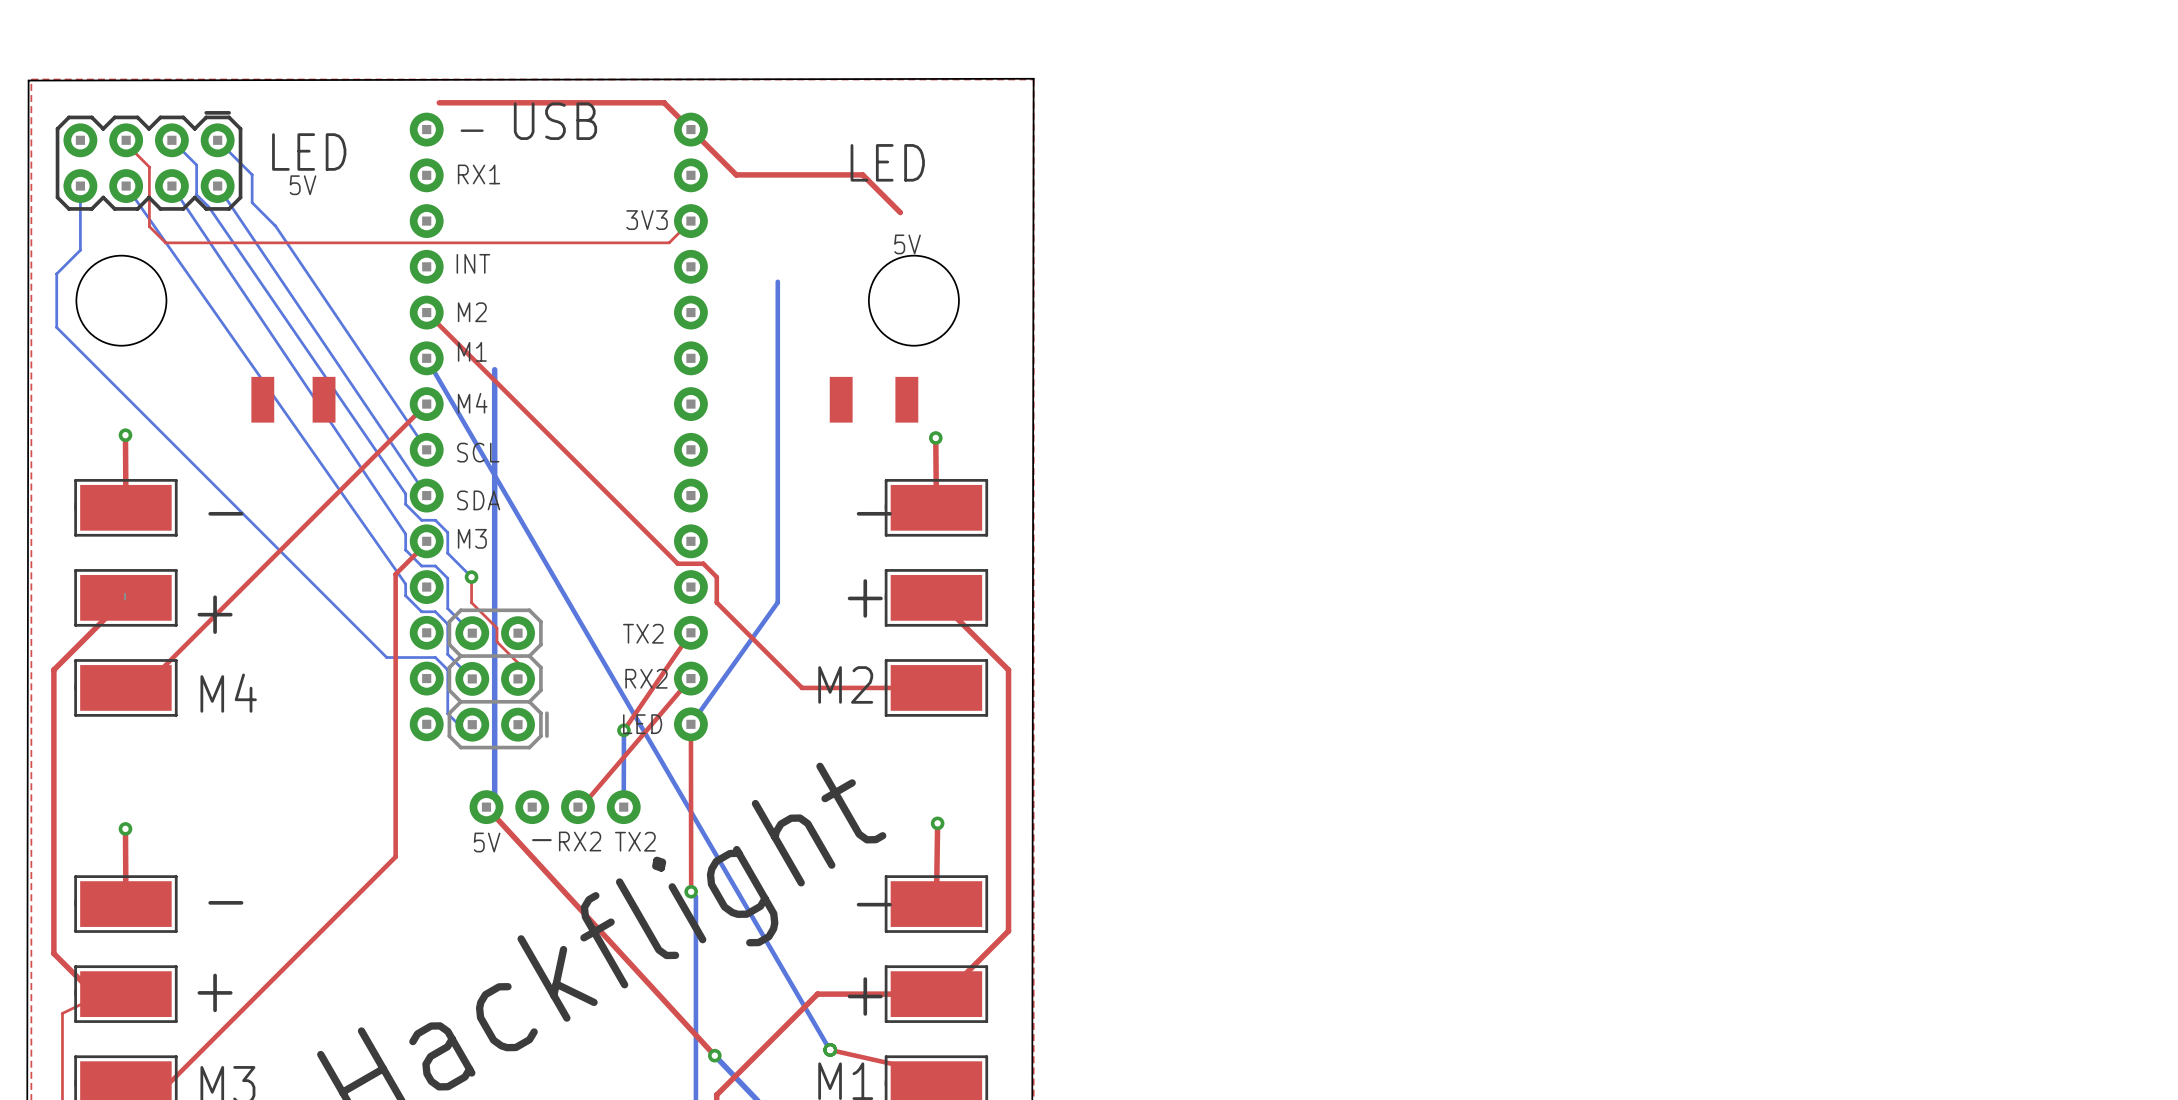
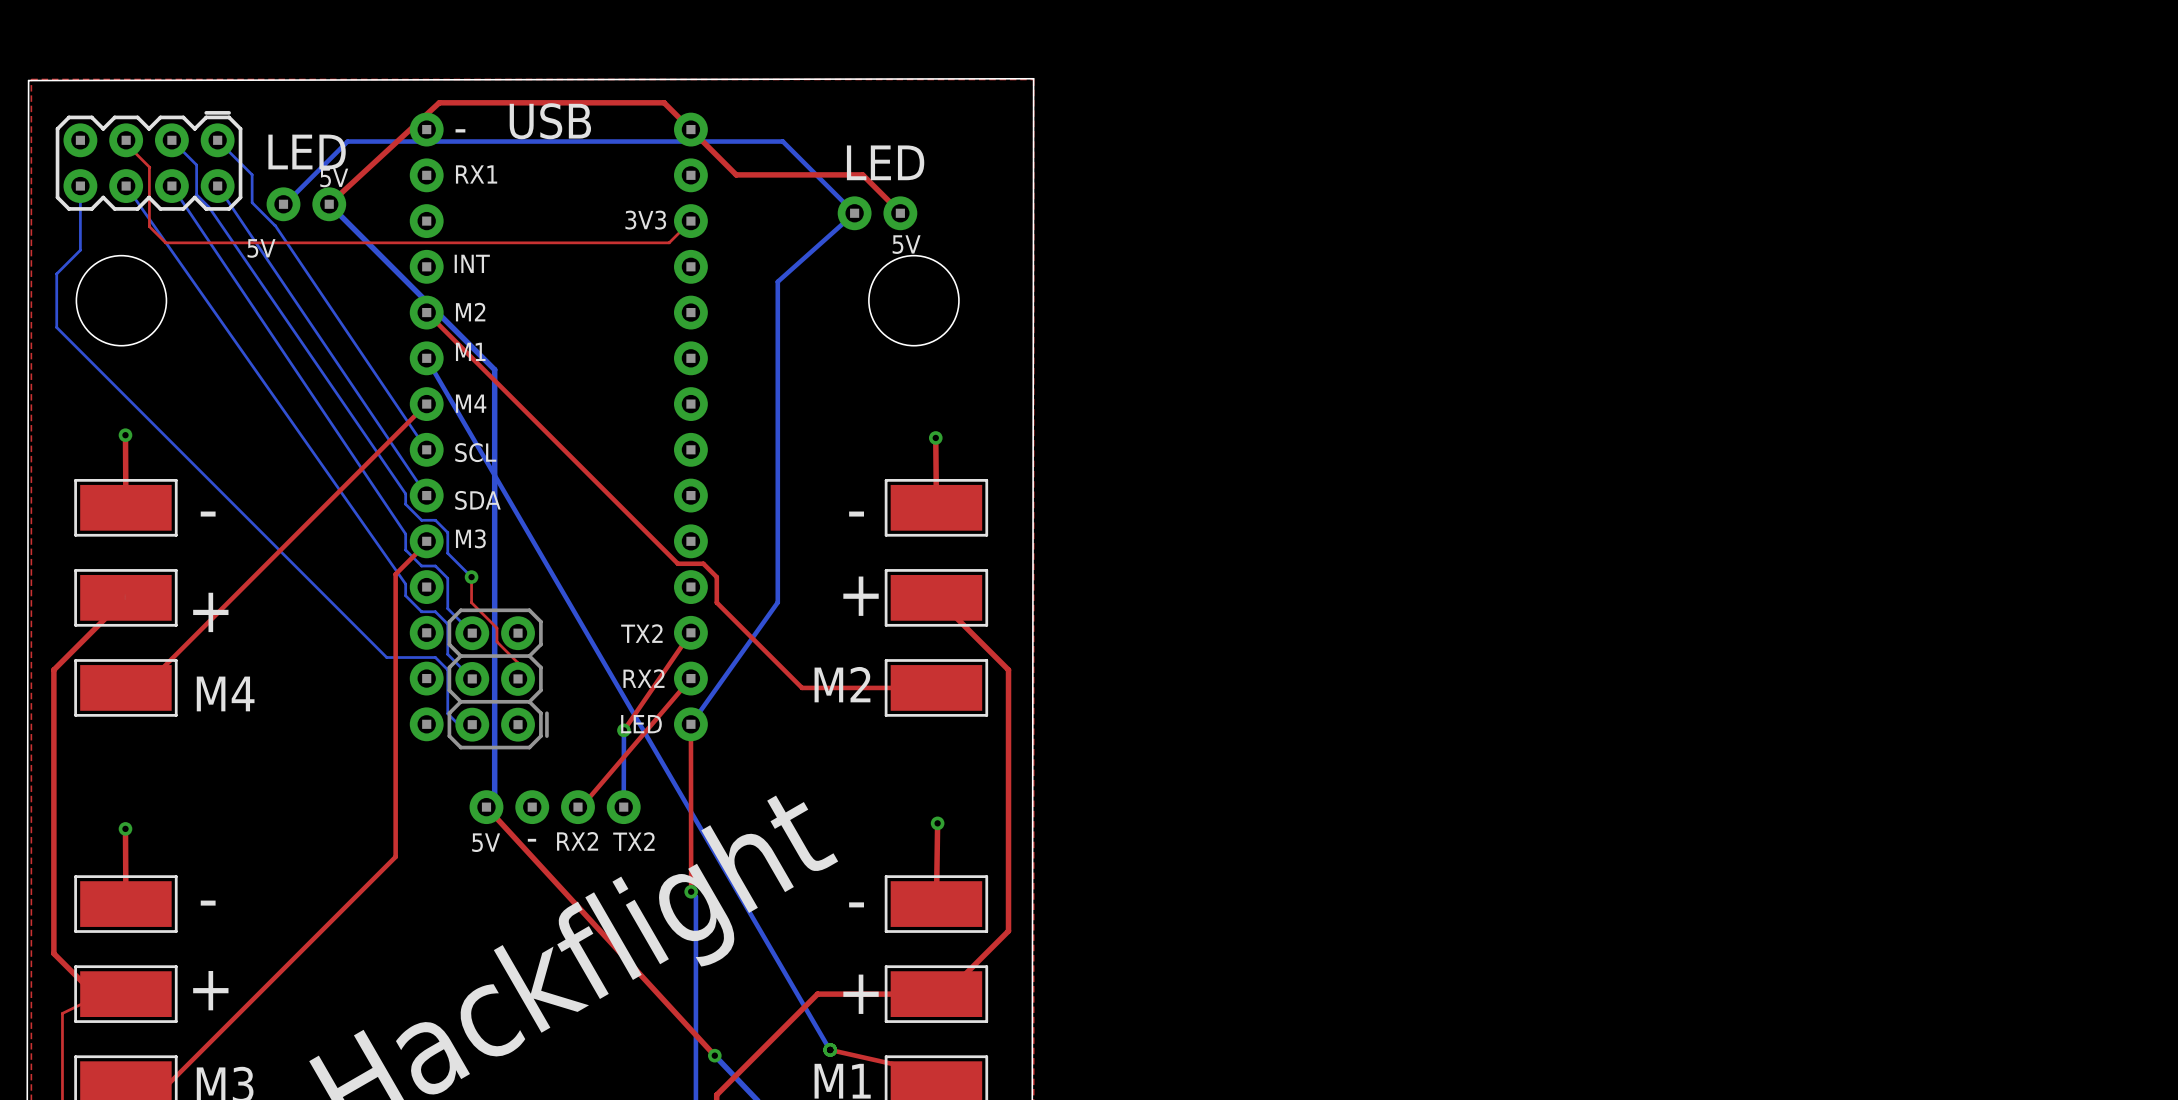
top track: none -> (439, 102) (329, 204)
text position: 5V (303, 185) -> 5V (334, 177)
bottom track: none -> (283, 204) (347, 141) (782, 141) (854, 213) (777, 281)
part: none -> (306, 204)
bottom track: none -> (329, 204) (494, 369)
part: none -> (877, 213)
text: none -> 5V (261, 248)
part: (262, 399) -> none
part: (324, 399) -> none
part: (841, 399) -> none
part: (906, 399) -> none

